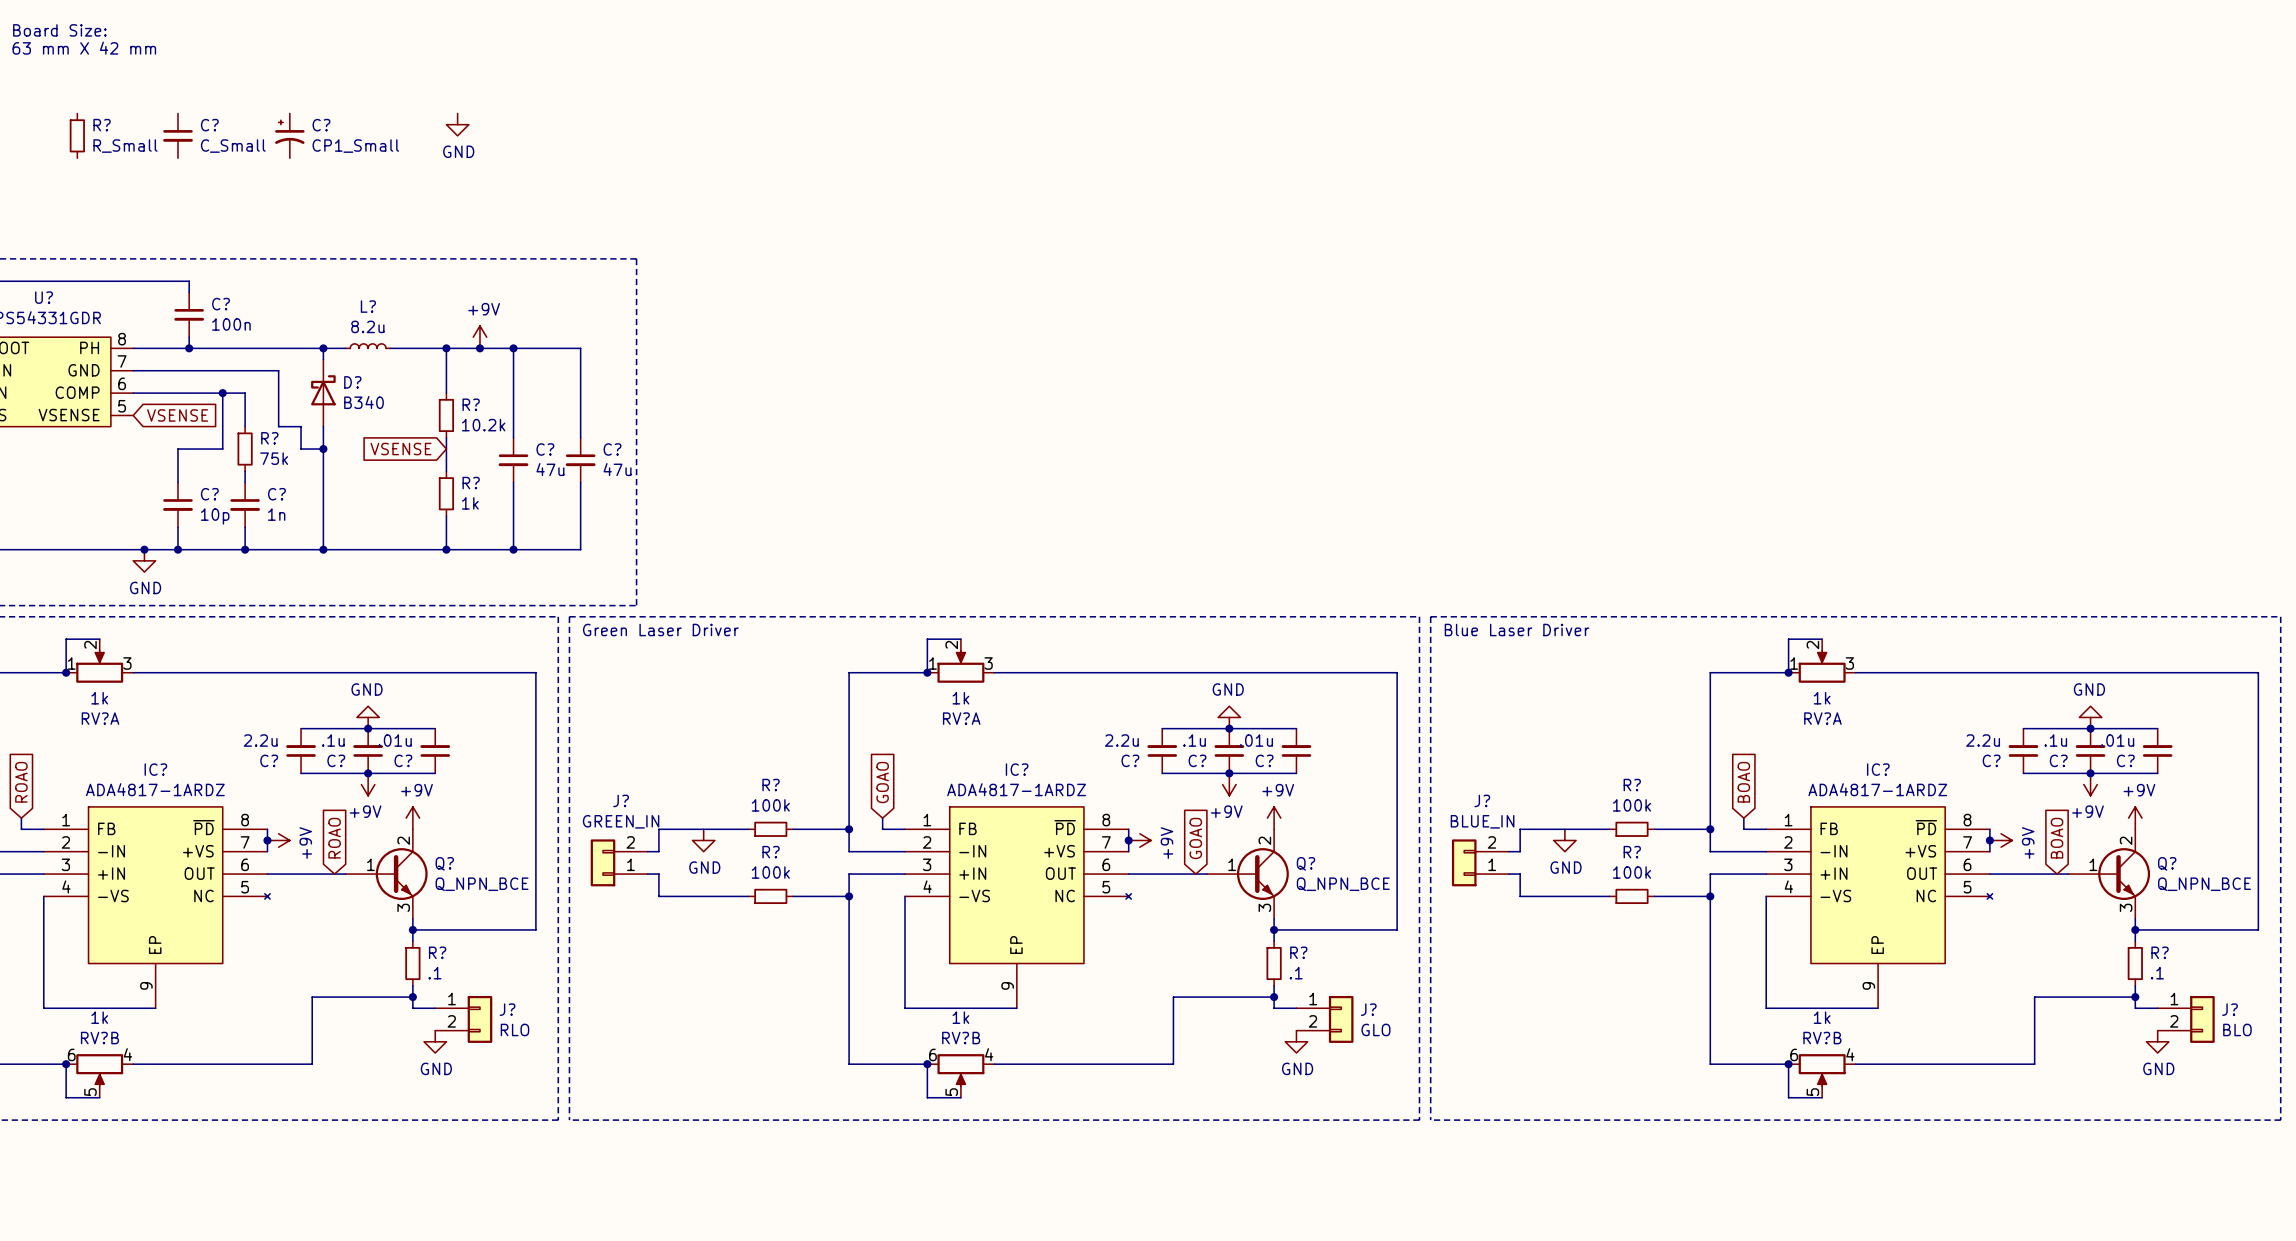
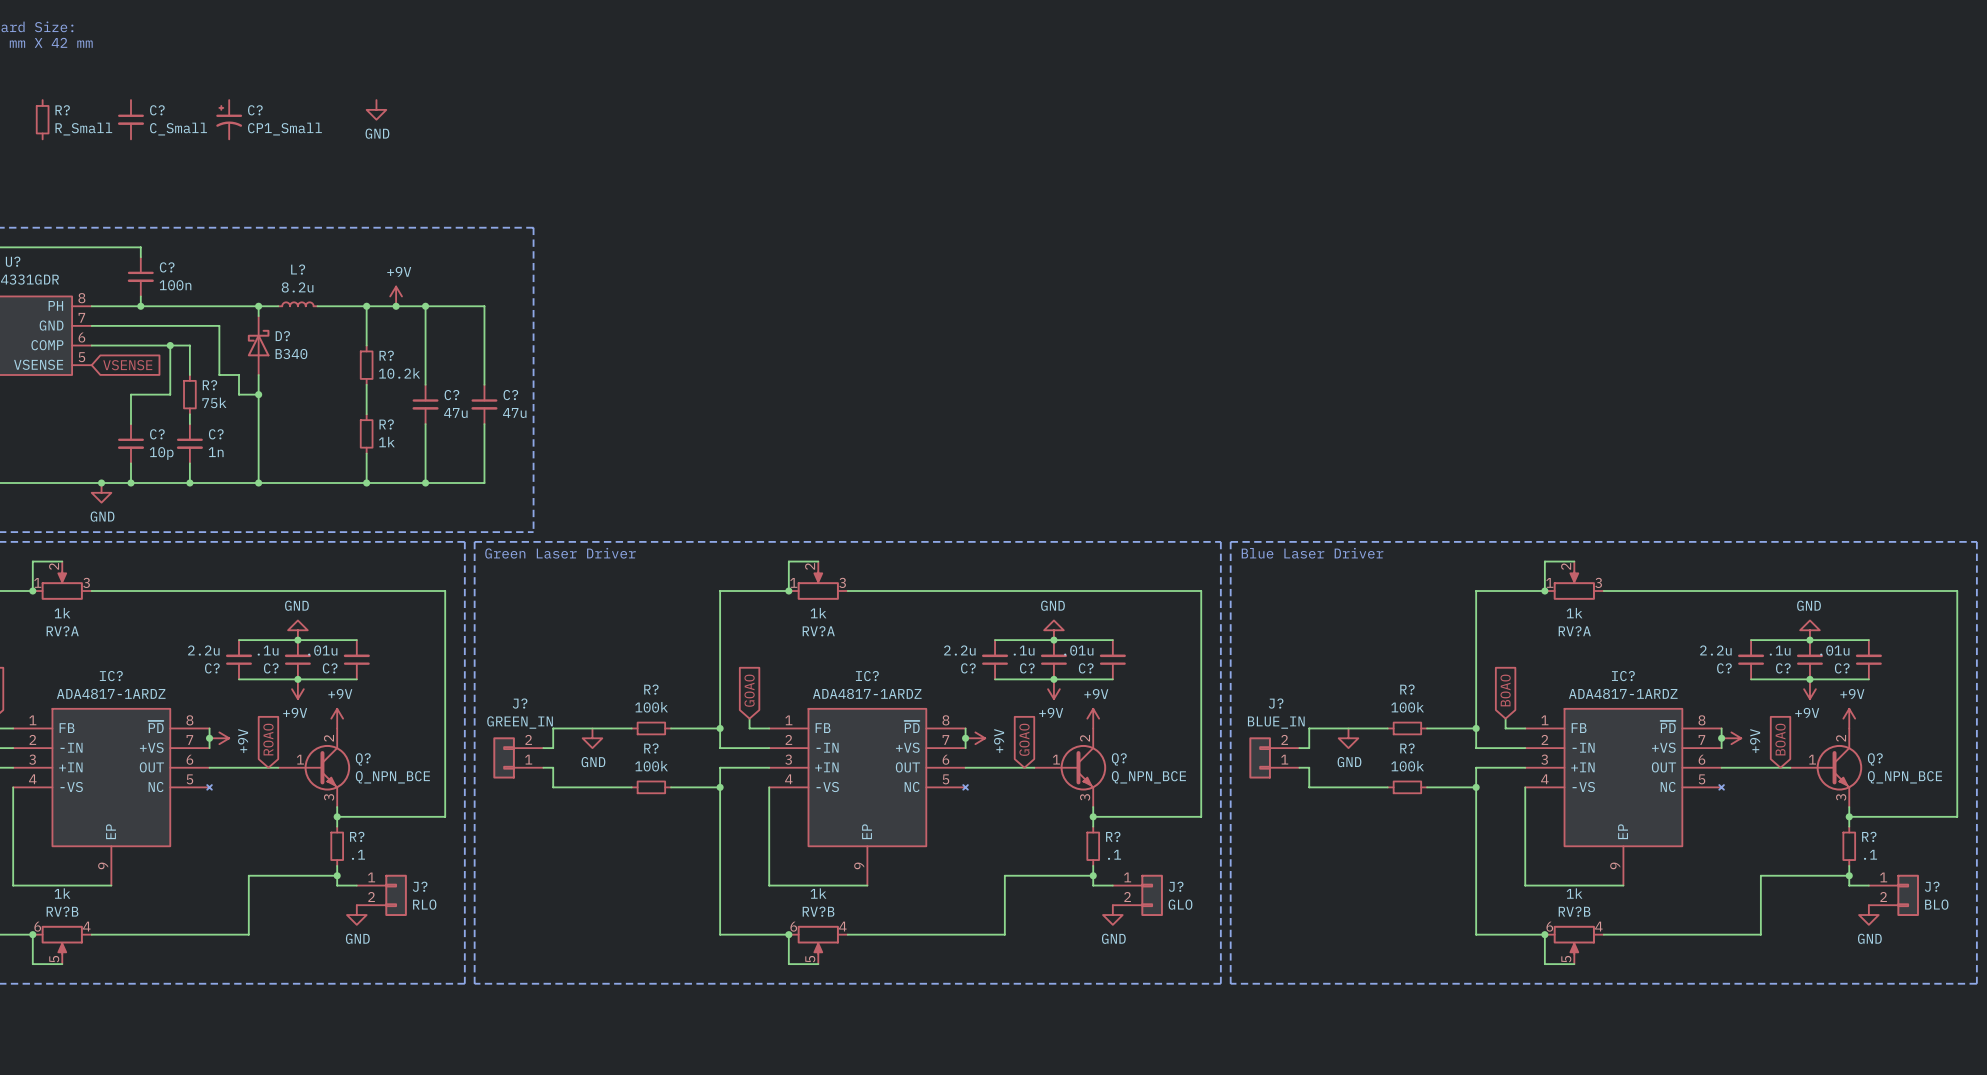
global label: VSENSE (401, 449) -> none

